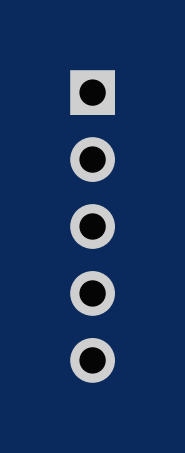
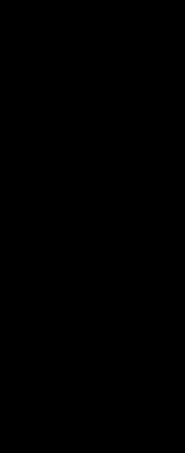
part: (92, 226) -> none

